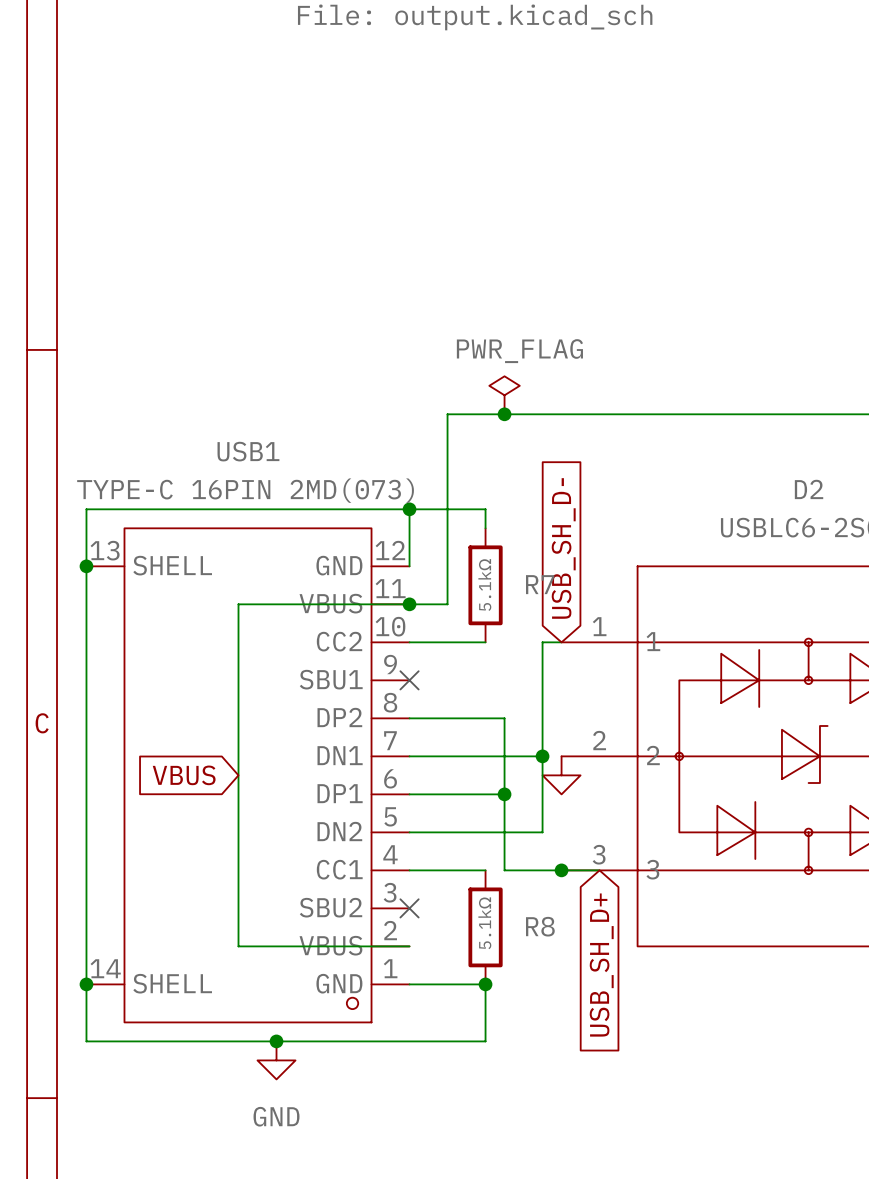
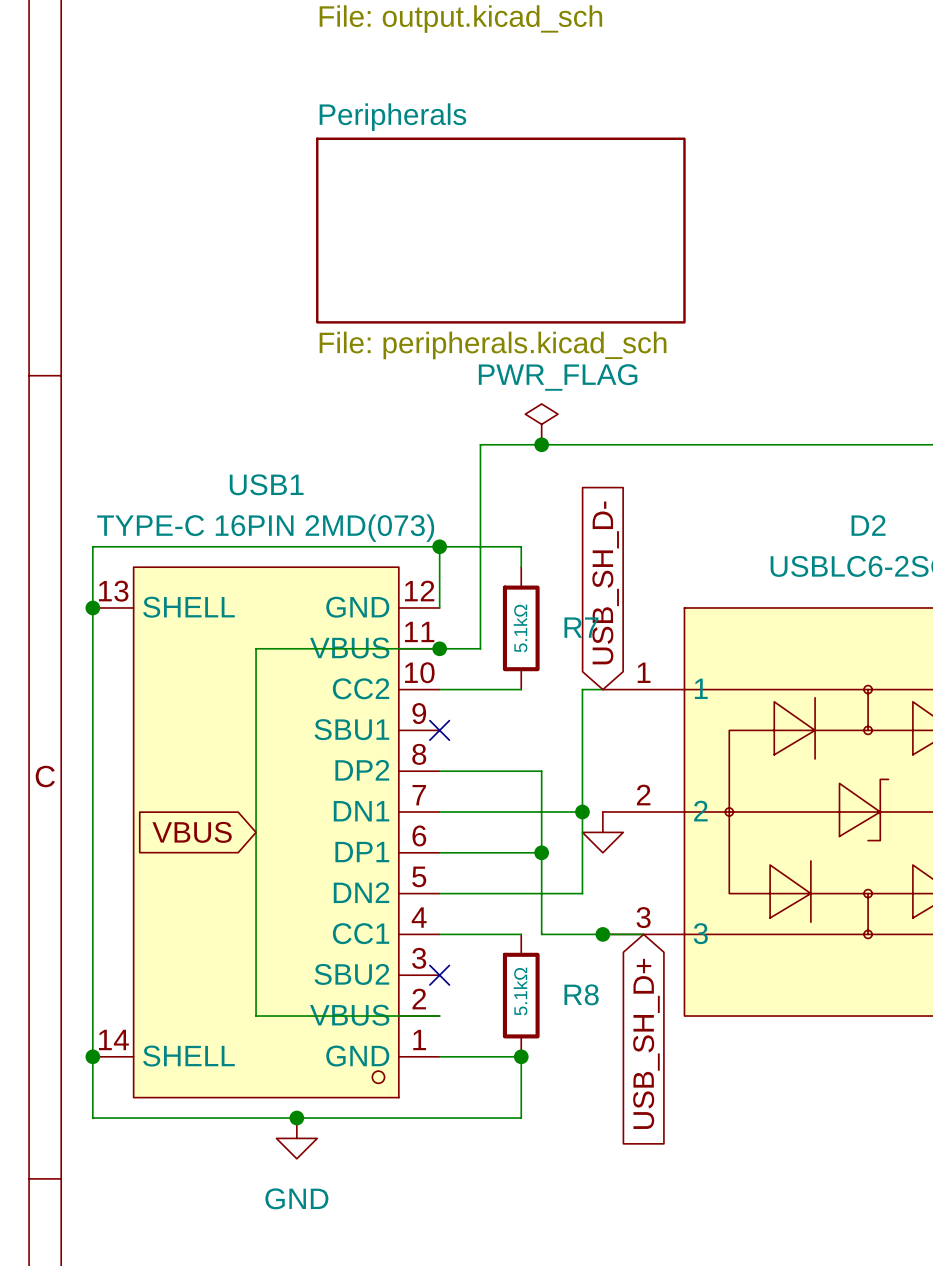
sheet Peripherals: none -> File: peripherals.kicad_sch (500, 230)

